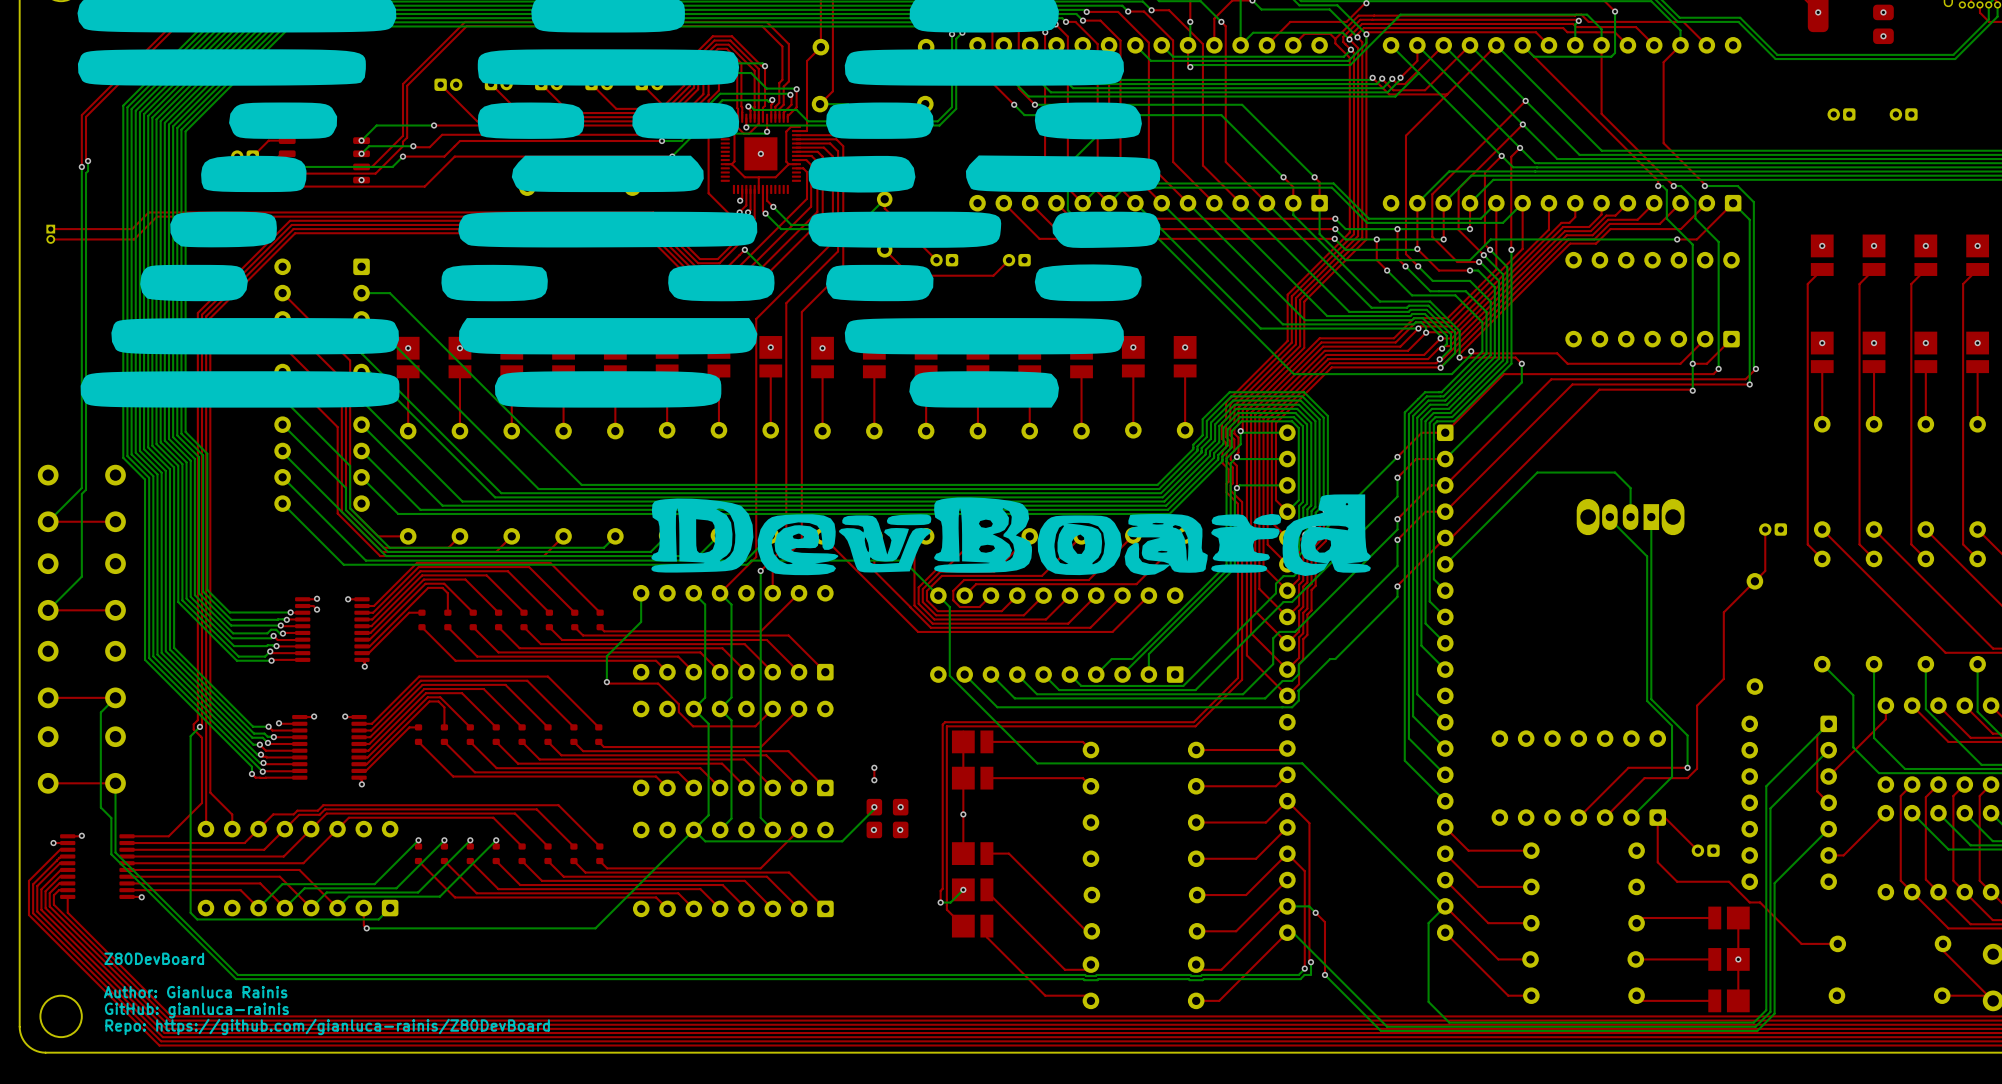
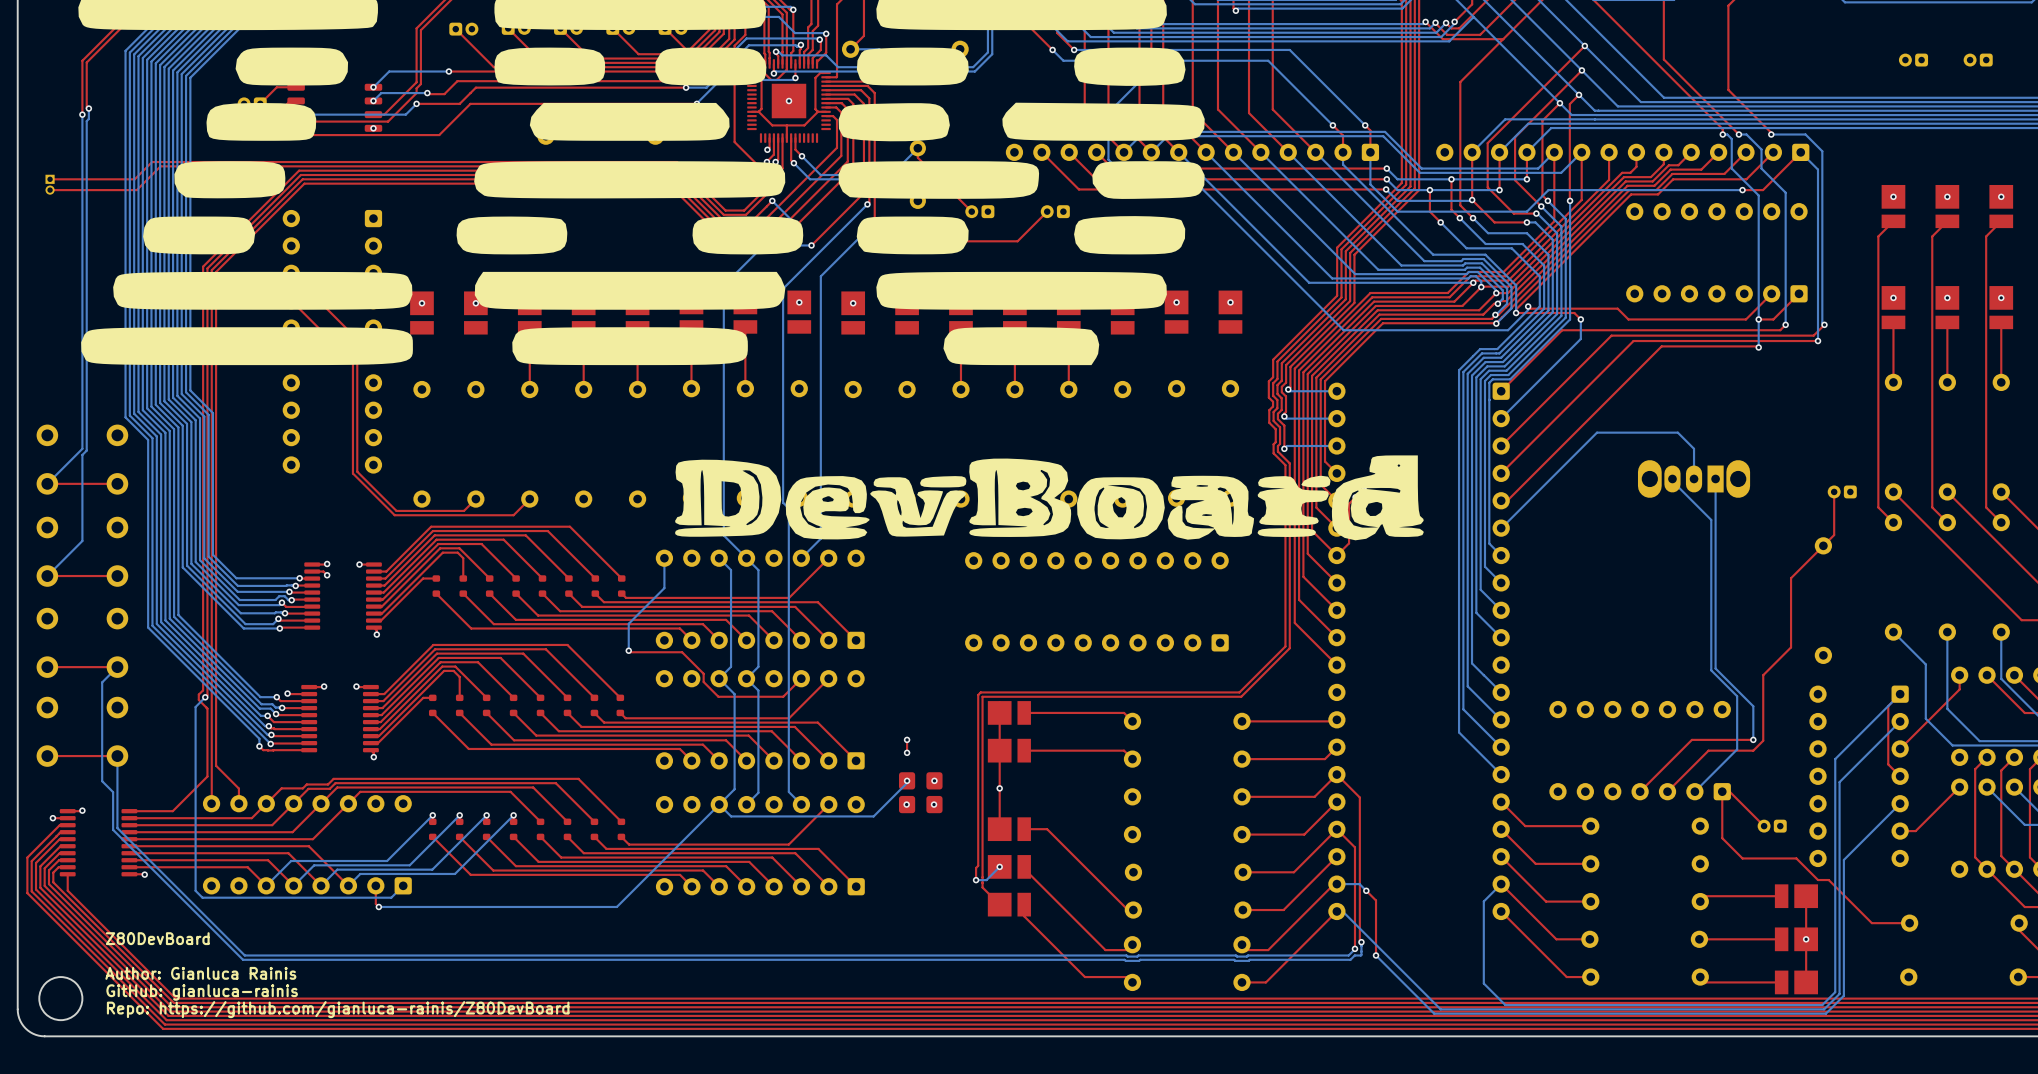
top track: (884, 249) (910, 275) (993, 275) -> (917, 241) (1017, 241) (1031, 227)
top track: (836, 253) (786, 303) (786, 545) (760, 570) -> none
bottom track: none -> (867, 204) (783, 288) (783, 502) (788, 508) (788, 535)
via: none -> (867, 204)
top track: (838, 275) (801, 311) (801, 540) (772, 570) (772, 593) -> none
bottom track: none -> (869, 227) (820, 276) (820, 538) (801, 558)
top track: (782, 292) (756, 318) (756, 557) (720, 593) -> none
bottom track: none -> (811, 245) (763, 245) (723, 285) (723, 535) (746, 558)
via: none -> (811, 245)
top track: (282, 293) (350, 360) (350, 508) (378, 536) (408, 536) -> none
bottom track: (361, 293) (389, 293) (581, 484) (1157, 484) (1193, 449) (1193, 444) (1202, 435) (1202, 419) (1229, 392) (1304, 392) (1327, 415) (1327, 501) (1330, 503) -> none
bottom track: (361, 319) (369, 319) (538, 489) (1159, 489) (1197, 450) (1197, 446) (1206, 437) (1206, 420) (1231, 396) (1302, 396) (1323, 417) (1323, 508) (1325, 510) -> none
bottom track: (361, 345) (361, 353) (501, 493) (1160, 493) (1201, 452) (1201, 448) (1210, 438) (1210, 422) (1233, 400) (1300, 400) (1319, 419) (1319, 508) (1315, 514) (1319, 519) -> none
top track: (770, 370) (770, 430) -> none
top track: (1133, 370) (1133, 430) -> none
top track: (1185, 370) (1185, 430) -> none
top track: (408, 371) (408, 431) -> none
top track: (459, 371) (459, 431) -> none
top track: (822, 371) (822, 431) -> none
top track: (874, 371) (874, 431) -> none
top track: (1081, 371) (1081, 431) -> none
top track: (282, 372) (337, 427) (337, 513) (380, 556) (543, 556) (563, 536) -> none
bottom track: (361, 372) (369, 372) (495, 497) (1162, 497) (1205, 452) -> none
bottom track: (282, 398) (350, 465) (350, 508) (389, 547) (603, 547) (615, 536) -> none
bottom track: (361, 398) (361, 400) (462, 501) (1164, 501) (1209, 454) -> none
bottom track: (282, 424) (345, 488) (345, 510) (387, 551) (650, 551) (667, 535) -> none
bottom track: (361, 424) (442, 505) (1166, 505) (1214, 456) -> none
bottom track: (1240, 431) (1240, 444) (1226, 458) (1226, 564) (1132, 659) (1111, 659) (1096, 674) -> none
top track: (1445, 432) (1421, 432) (1397, 457) -> none
bottom track: (282, 450) (386, 556) (698, 556) (718, 535) -> none
bottom track: (361, 450) (420, 509) (1167, 509) (1218, 459) (1218, 454) (1227, 445) (1227, 429) (1239, 417) (1293, 417) (1302, 426) (1302, 501) (1299, 505) (1299, 526) (1287, 537) -> none
bottom track: (1205, 452) (1205, 449) (1215, 440) (1215, 424) (1234, 404) (1298, 404) (1315, 421) (1315, 507) (1311, 511) (1311, 522) (1313, 524) -> none
bottom track: (1209, 454) (1209, 451) (1219, 442) (1219, 426) (1236, 408) (1297, 408) (1311, 422) (1311, 505) (1307, 509) (1307, 529) (1305, 534) -> none
bottom track: (1214, 456) (1214, 453) (1223, 443) (1223, 427) (1238, 413) (1295, 413) (1307, 424) (1307, 503) (1303, 507) (1303, 528) (1299, 532) (1299, 549) (1287, 561) (1287, 564) -> none
bottom track: (1236, 457) (1230, 463) (1230, 566) (1122, 674) -> none
bottom track: (1397, 457) (1299, 555) (1299, 570) (1293, 576) (1283, 576) (1275, 583) (1275, 593) (1183, 685) (1081, 685) (1069, 674) -> none
via: (1397, 457) -> none
top track: (1445, 459) (1416, 459) (1397, 477) -> none
bottom track: (282, 477) (365, 560) (745, 560) (770, 535) -> none
bottom track: (361, 477) (398, 513) (1169, 513) (1222, 461) (1222, 456) (1231, 447) (1231, 431) (1241, 421) (1292, 421) (1298, 428) (1298, 500) (1287, 511) -> none
bottom track: (1397, 477) (1397, 496) (1292, 602) (1283, 602) (1195, 690) (1059, 690) (1043, 674) -> none
via: (1397, 477) -> none
top track: (1445, 485) (1431, 485) (1397, 519) -> none
bottom track: (1236, 488) (1234, 490) (1234, 568) (1148, 654) (1148, 674) -> none
bottom track: (282, 503) (343, 564) (747, 564) (751, 560) (903, 560) (949, 607) (949, 675) (1037, 763) (1302, 763) (1445, 906) -> none
top track: (1330, 503) (1331, 513) (1330, 523) (1326, 532) (1326, 540) (1315, 551) (1315, 585) (1311, 589) (1311, 610) (1307, 614) (1307, 634) (1303, 639) (1303, 659) (1299, 663) (1299, 684) (1287, 695) -> none
top track: (1325, 510) (1326, 521) (1321, 530) (1321, 539) (1311, 549) (1311, 584) (1307, 588) (1307, 608) (1303, 612) (1303, 633) (1299, 637) (1299, 657) (1287, 669) -> none
top track: (1445, 511) (1425, 511) (1397, 539) -> none
top track: (1319, 519) (1317, 537) (1307, 547) (1307, 582) (1303, 586) (1303, 606) (1299, 611) (1299, 631) (1287, 643) -> none
bottom track: (1397, 519) (1397, 529) (1295, 631) (1279, 631) (1273, 638) (1273, 664) (1243, 694) (1037, 694) (1017, 674) -> none
via: (1397, 519) -> none
top track: (1313, 524) (1313, 535) (1303, 546) (1303, 580) (1299, 584) (1299, 605) (1287, 616) -> none
top track: (1133, 535) (1088, 580) (964, 580) (953, 590) (953, 600) (959, 607) (979, 607) (990, 595) -> none
top track: (1185, 535) (1136, 584) (976, 584) (964, 595) -> none
top track: (822, 536) (918, 631) (1112, 631) (1148, 595) -> none
top track: (874, 536) (874, 570) (930, 627) (1090, 627) (1122, 595) -> none
top track: (926, 536) (914, 548) (914, 605) (932, 623) (1068, 623) (1096, 595) -> none
top track: (977, 536) (946, 567) (938, 567) (918, 587) (918, 603) (934, 619) (1046, 619) (1069, 595) -> none
top track: (1029, 536) (994, 571) (940, 571) (922, 589) (922, 602) (936, 615) (1023, 615) (1043, 595) -> none
top track: (1081, 536) (1041, 575) (941, 575) (926, 590) (926, 600) (937, 611) (1001, 611) (1017, 595) -> none
top track: (1445, 537) (1397, 586) -> none
bottom track: (1397, 539) (1397, 566) (1298, 664) (1298, 674) (1292, 680) (1282, 680) (1265, 698) (1014, 698) (990, 674) -> none
via: (1397, 539) -> none
via: (760, 570) -> none
bottom track: (1397, 586) (1397, 596) (1335, 659) (1330, 659) (1298, 690) (1298, 700) (1292, 707) (997, 707) (964, 674) -> none
via: (1397, 586) -> none

